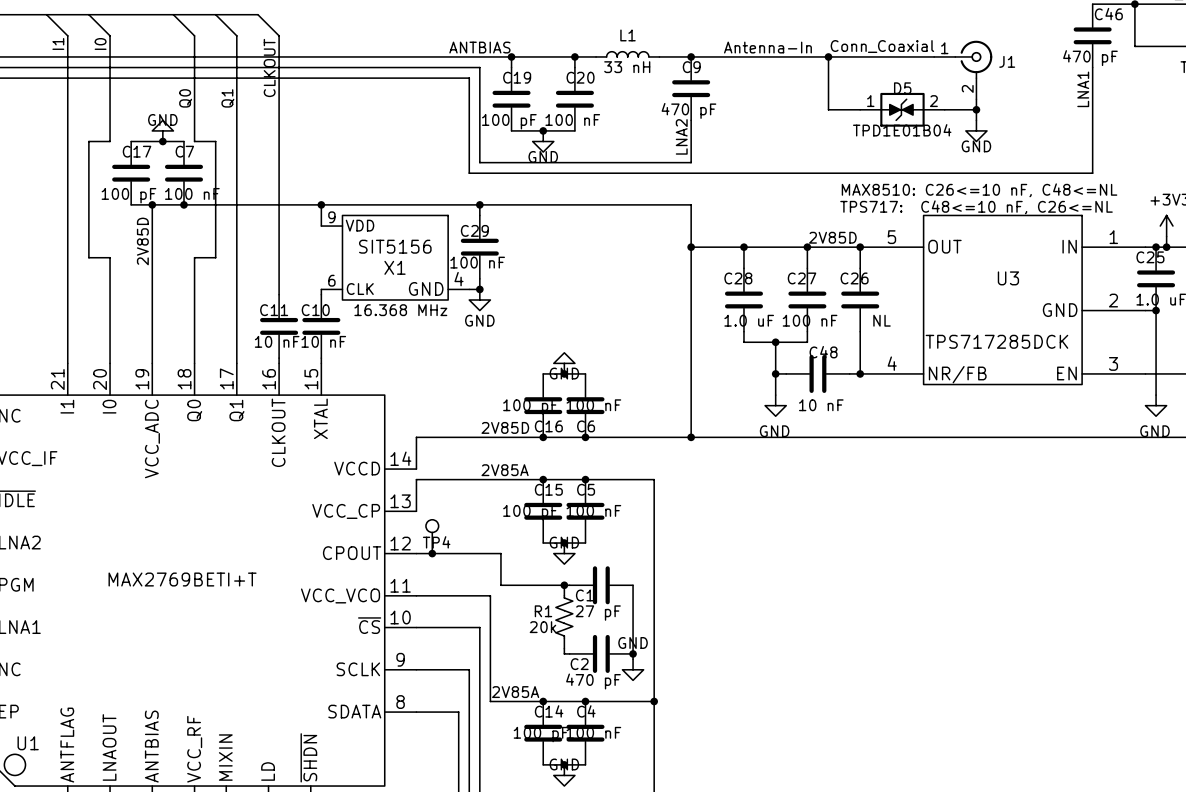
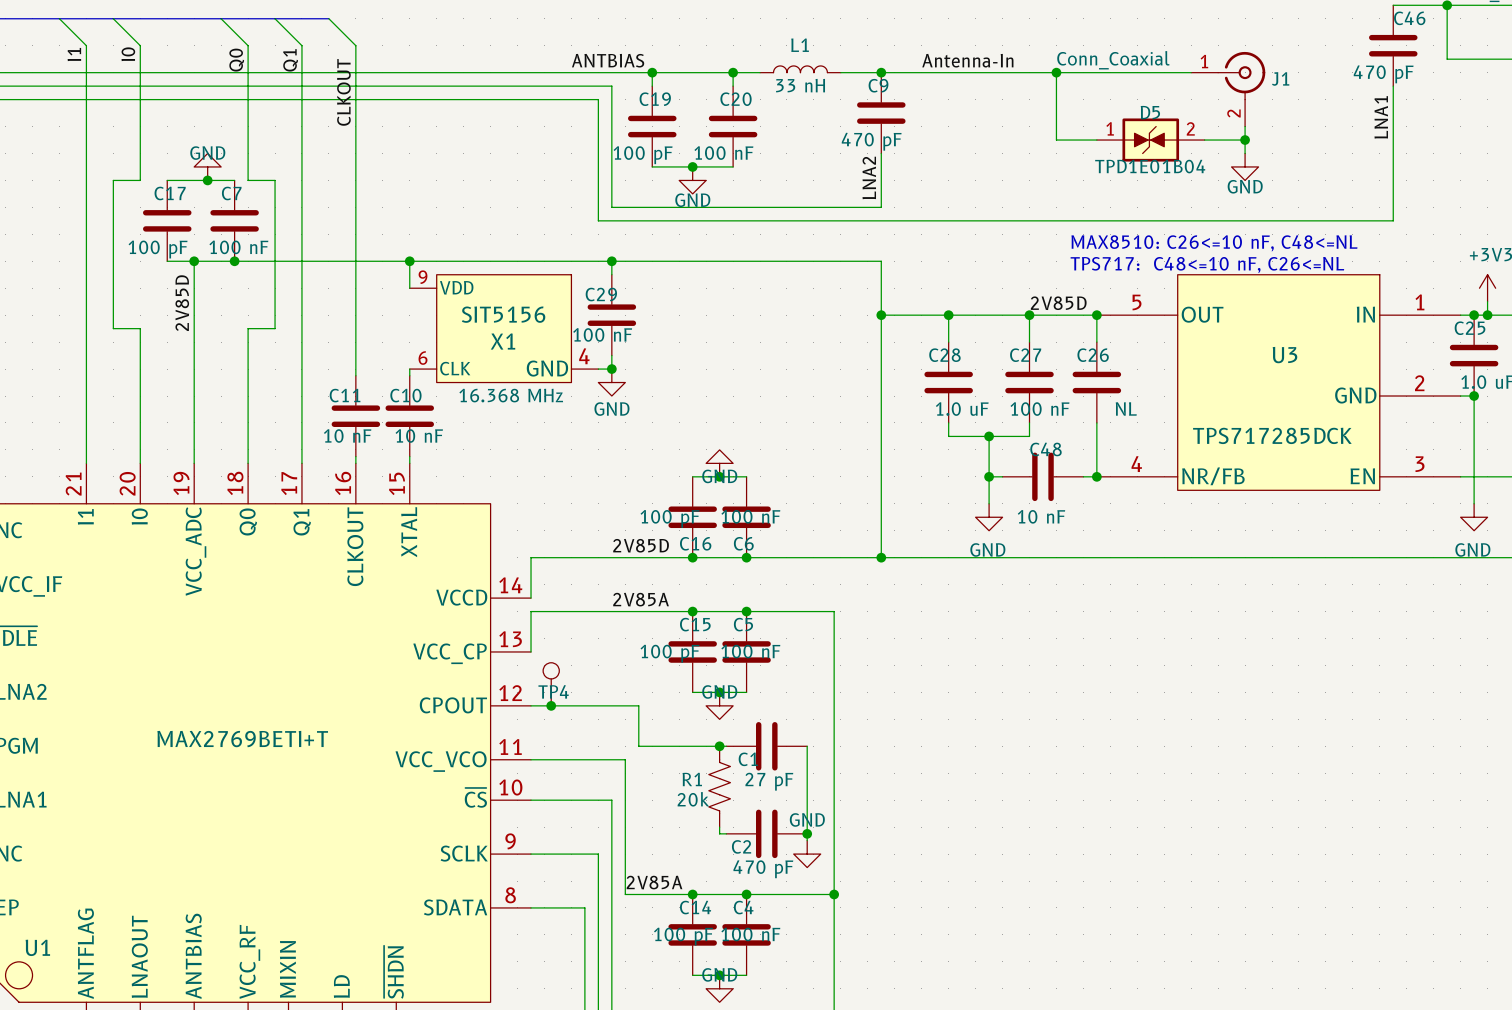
label position: Q0 (185, 98) -> Q0 (236, 60)
label position: Q1 (227, 98) -> Q1 (290, 60)

